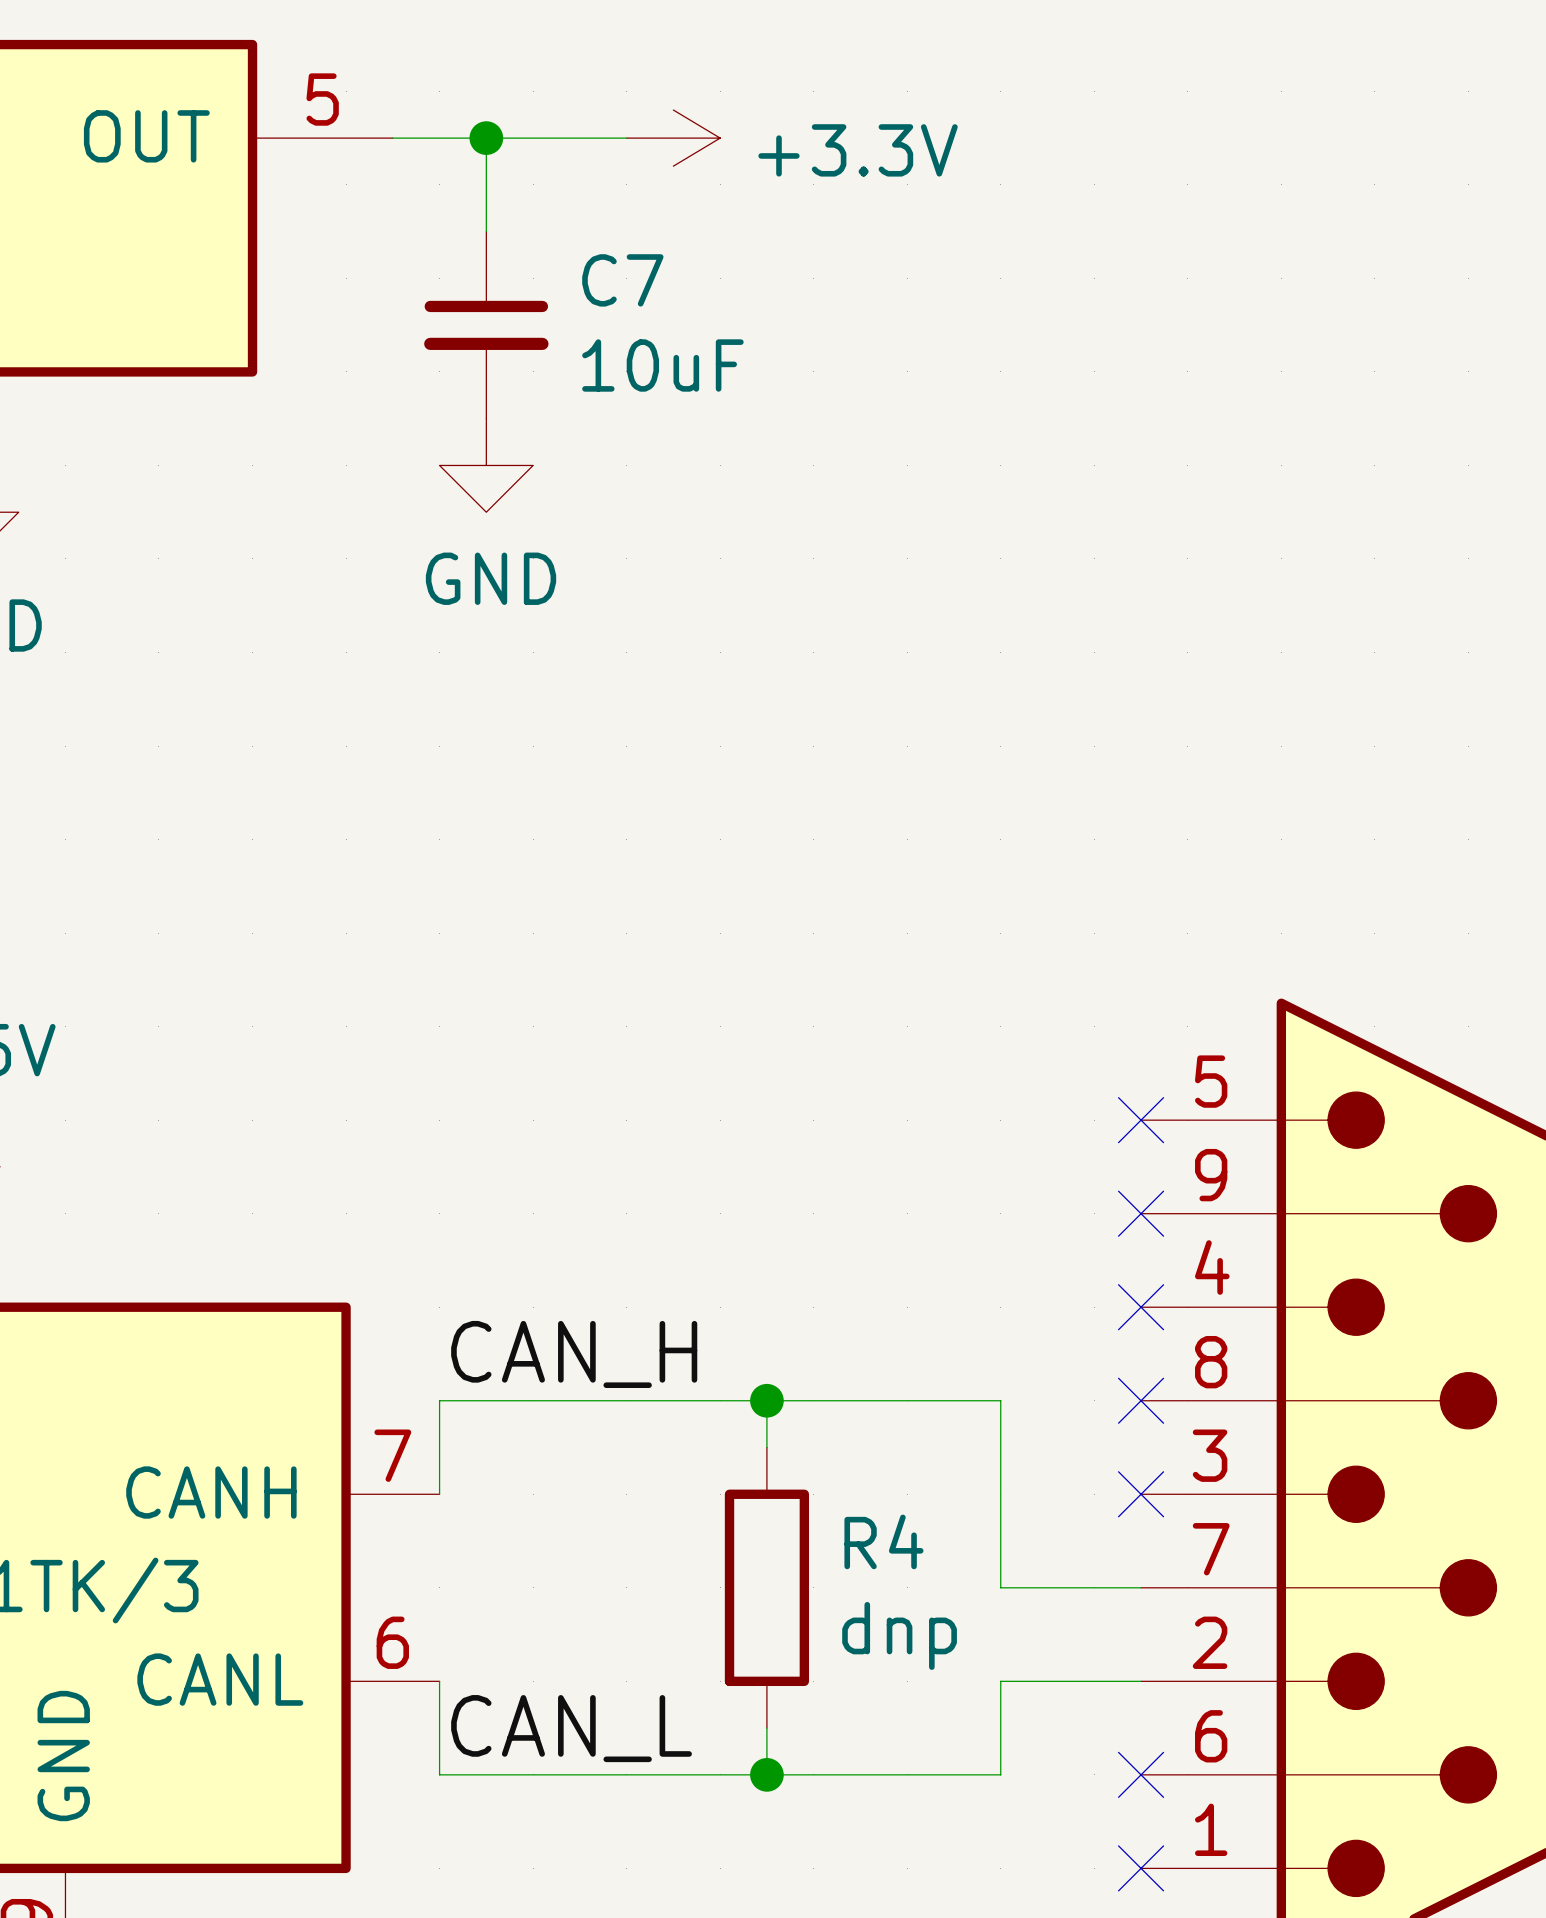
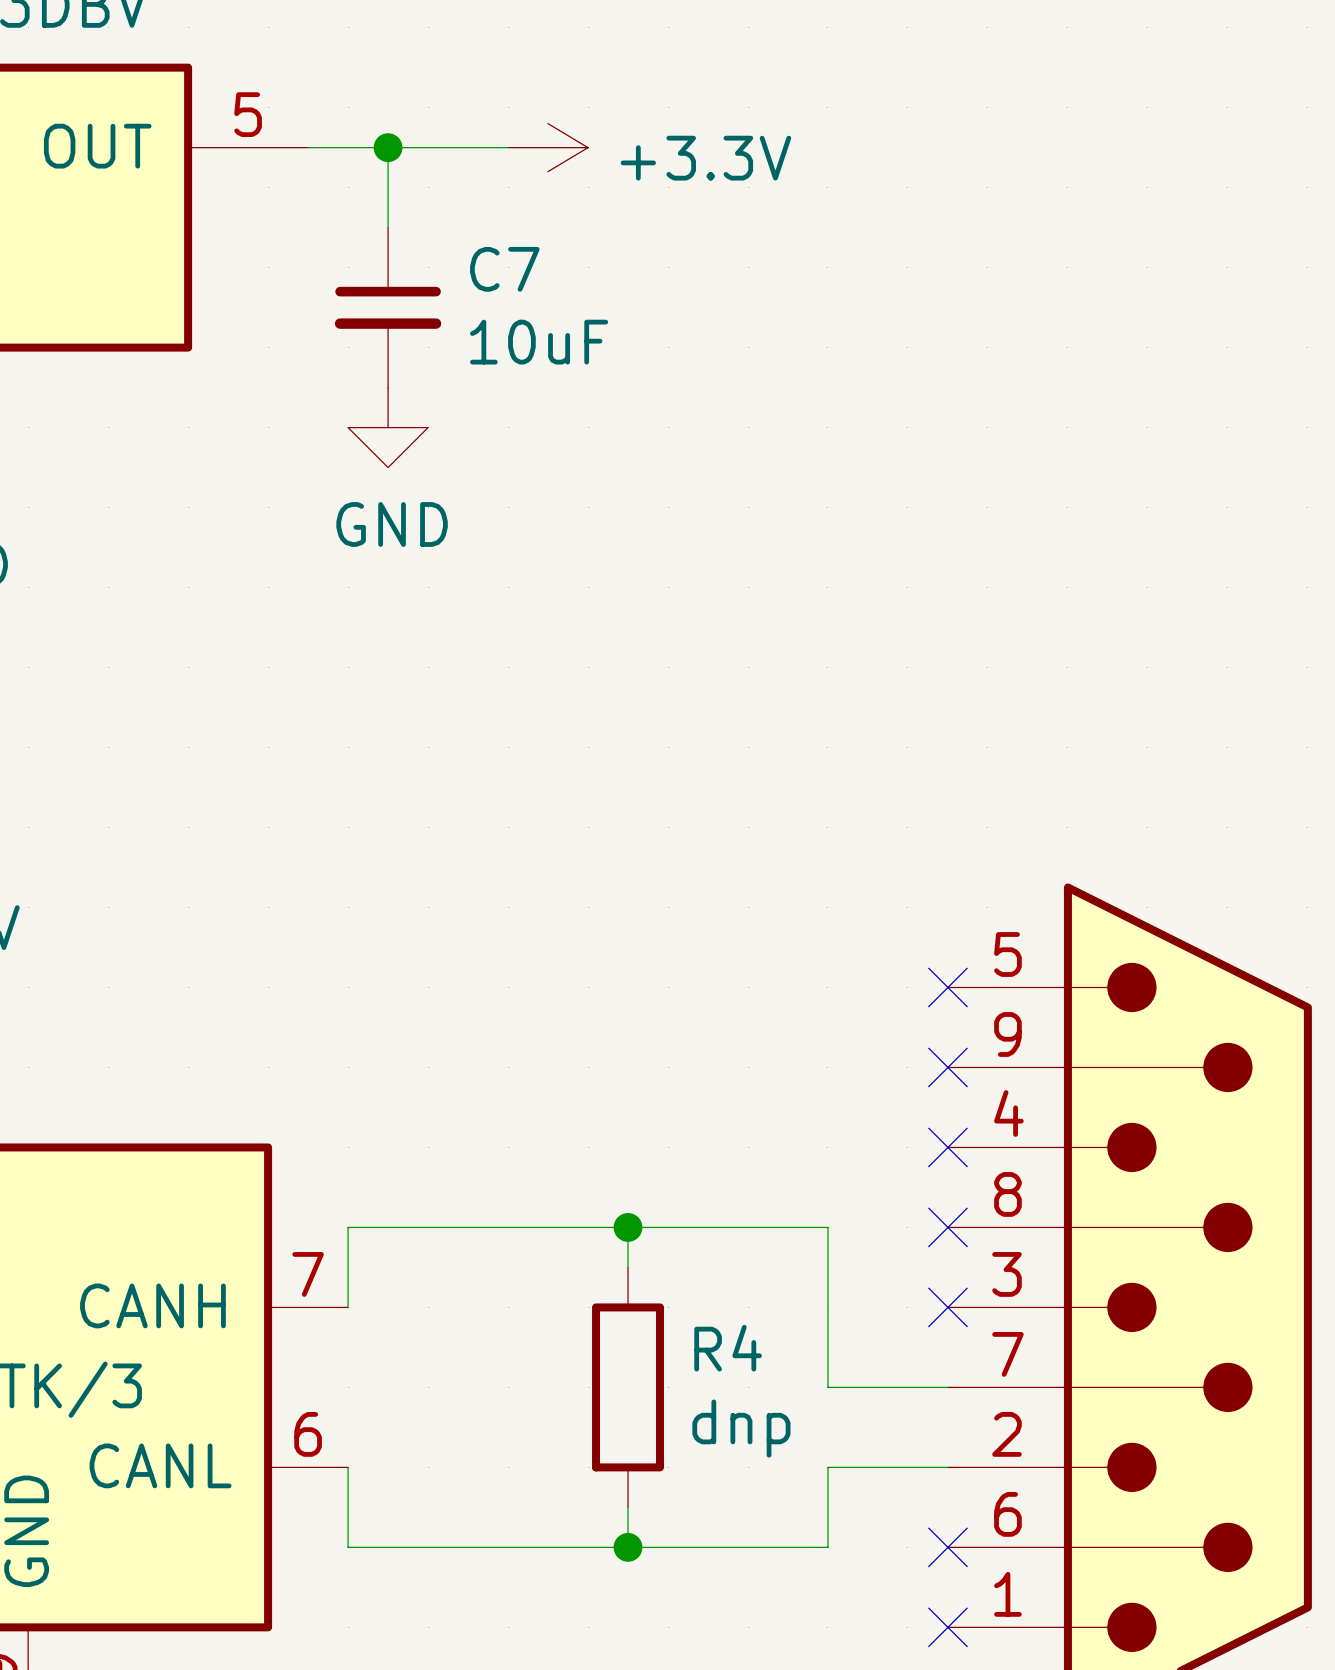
label: CAN_H (574, 1354) -> none
label: CAN_L (571, 1728) -> none

